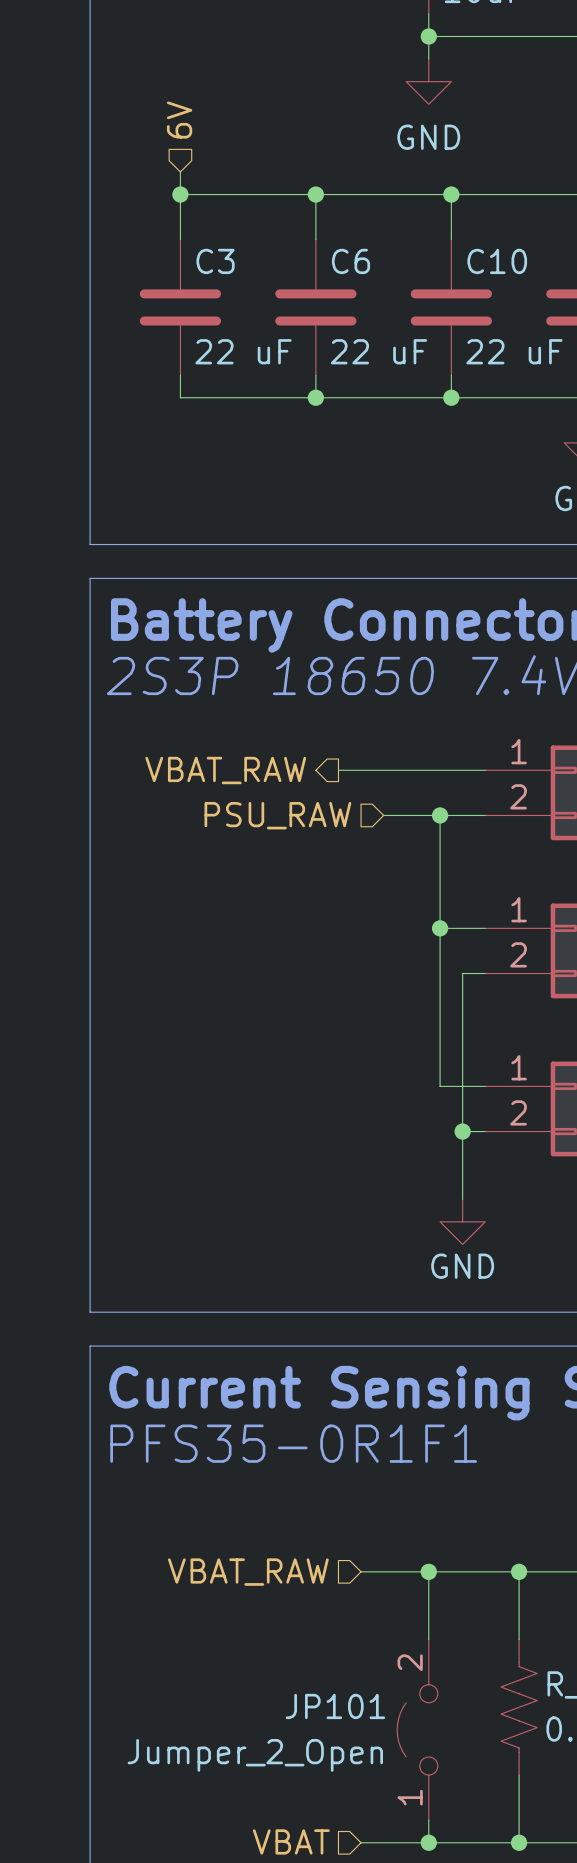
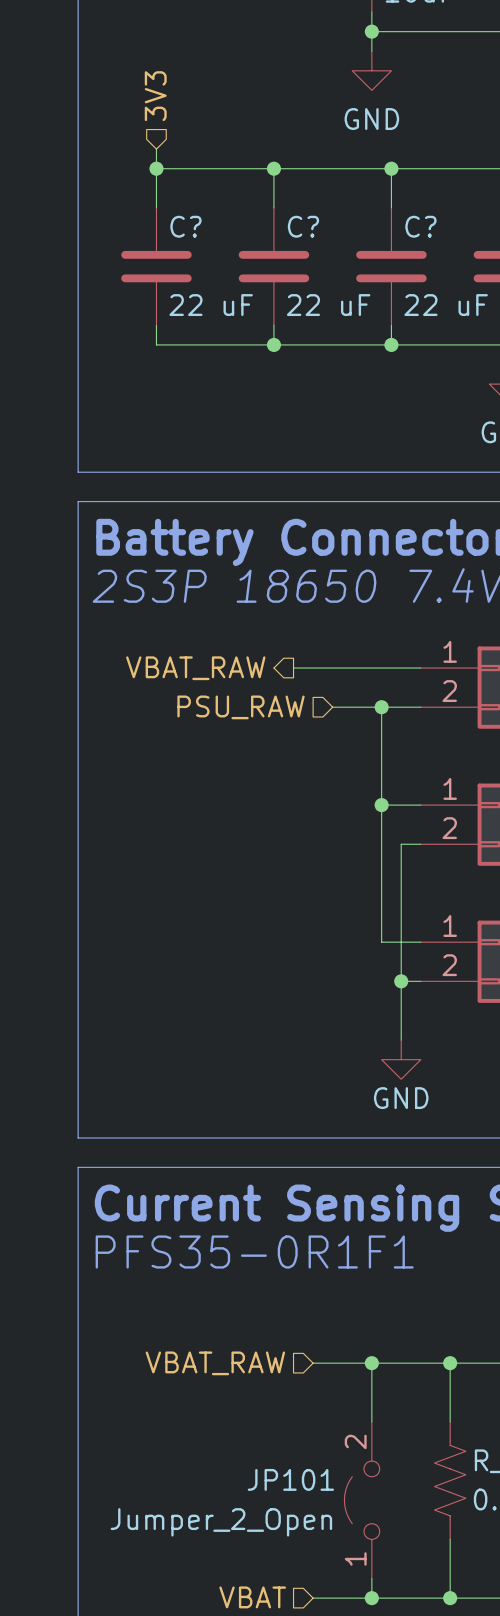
hierarchical label: 6V (179, 120) -> 3V3 (155, 96)
C3 name: C3 (215, 261) -> C? (185, 226)
C6 name: C6 (351, 261) -> C? (303, 226)
C10 name: C10 (497, 261) -> C? (420, 226)

